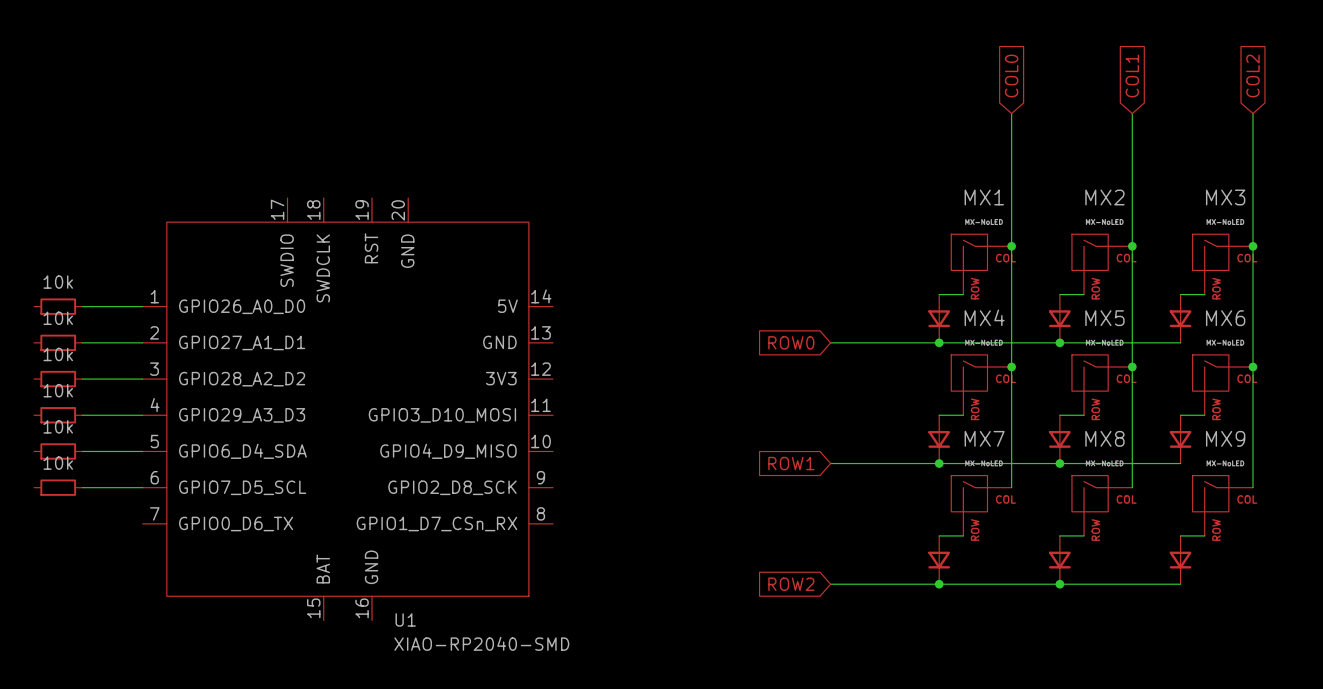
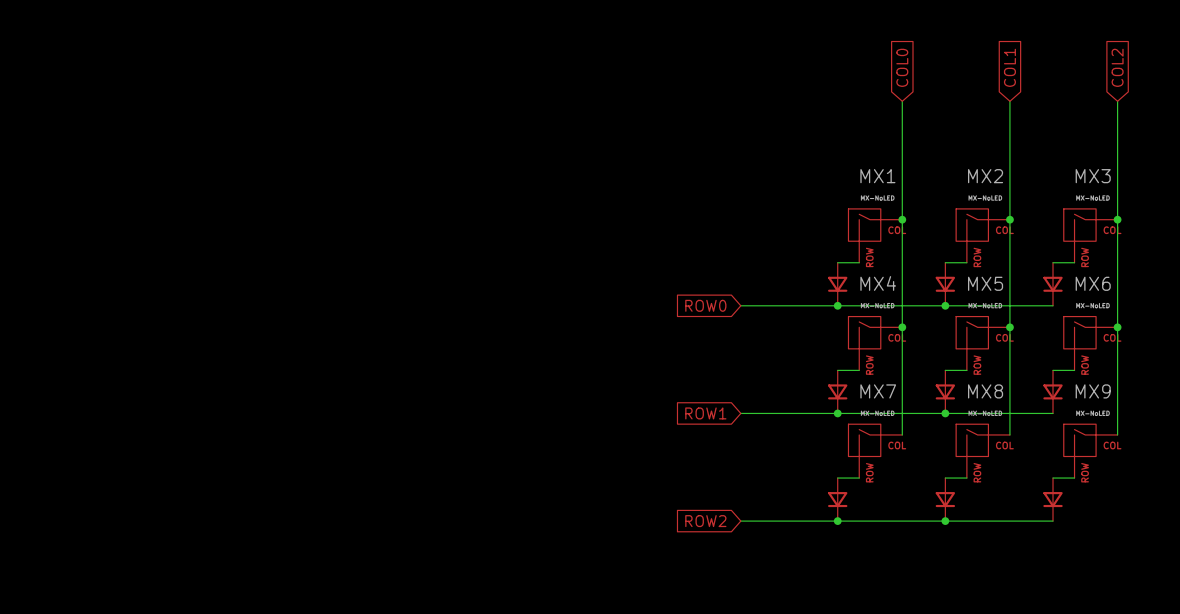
part: 10k (58, 306) -> none
wire: (82, 306) (142, 306) -> none
part: 10k (58, 342) -> none
wire: (82, 342) (142, 342) -> none
part: 10k (58, 379) -> none
wire: (82, 379) (142, 379) -> none
U1: XIAO-RP2040-SMD (347, 409) -> none
part: 10k (58, 415) -> none
wire: (82, 415) (142, 415) -> none
part: 10k (58, 451) -> none
wire: (82, 451) (142, 451) -> none
part: 10k (58, 487) -> none
wire: (82, 487) (142, 487) -> none

